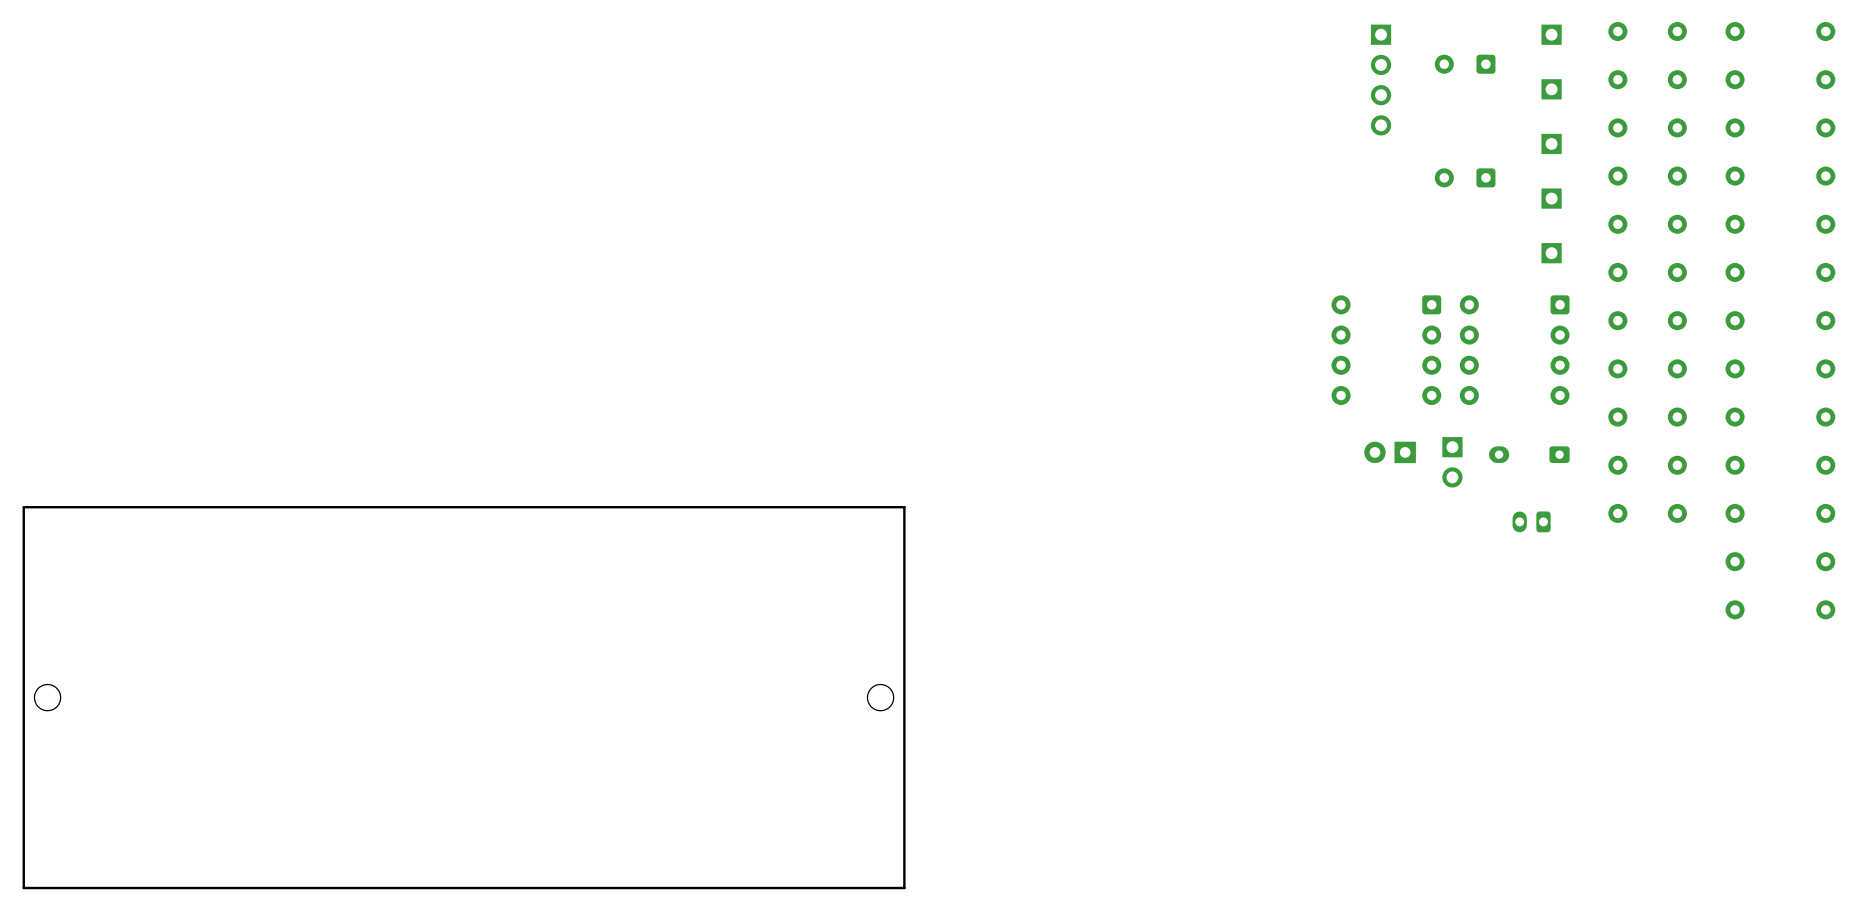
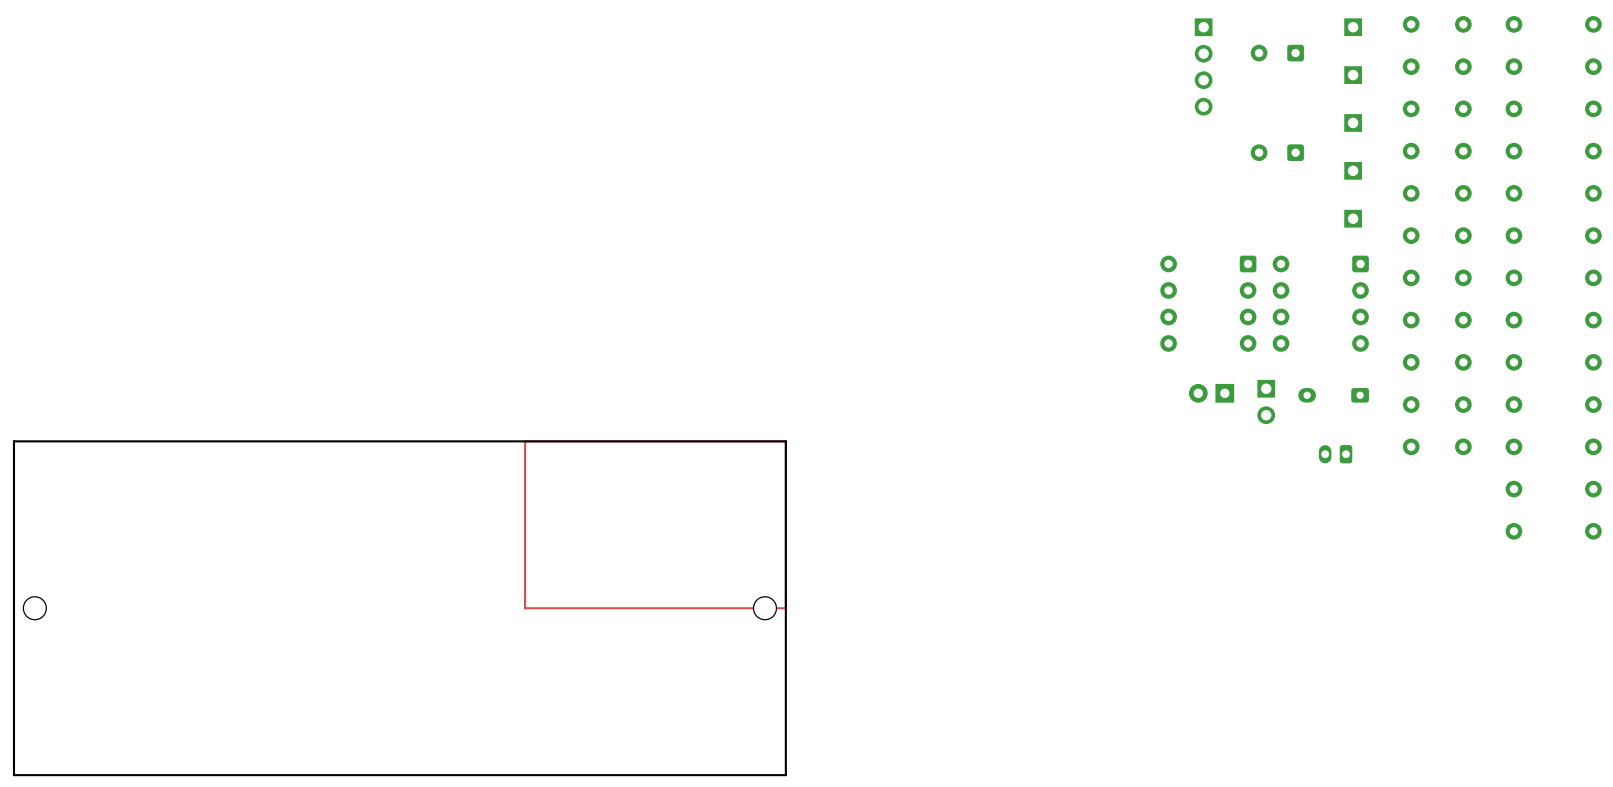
top track: none -> (785, 441) (525, 441) (525, 608) (785, 608) (785, 441)

